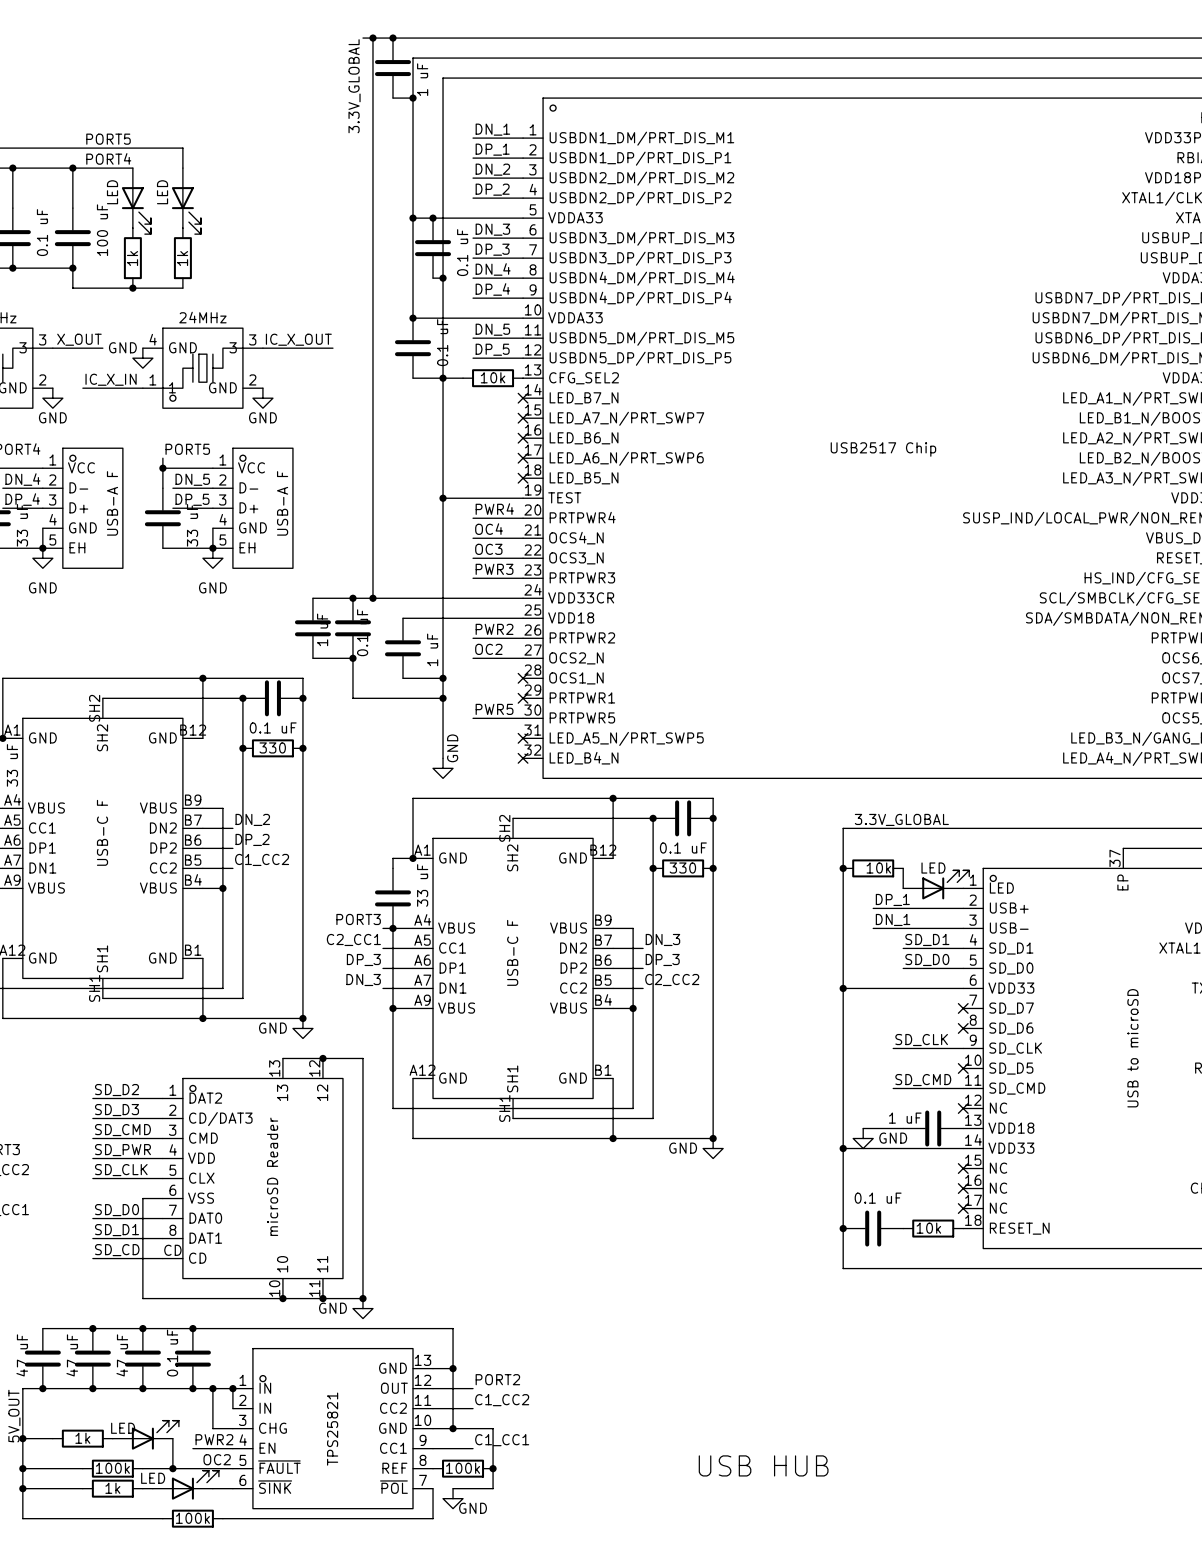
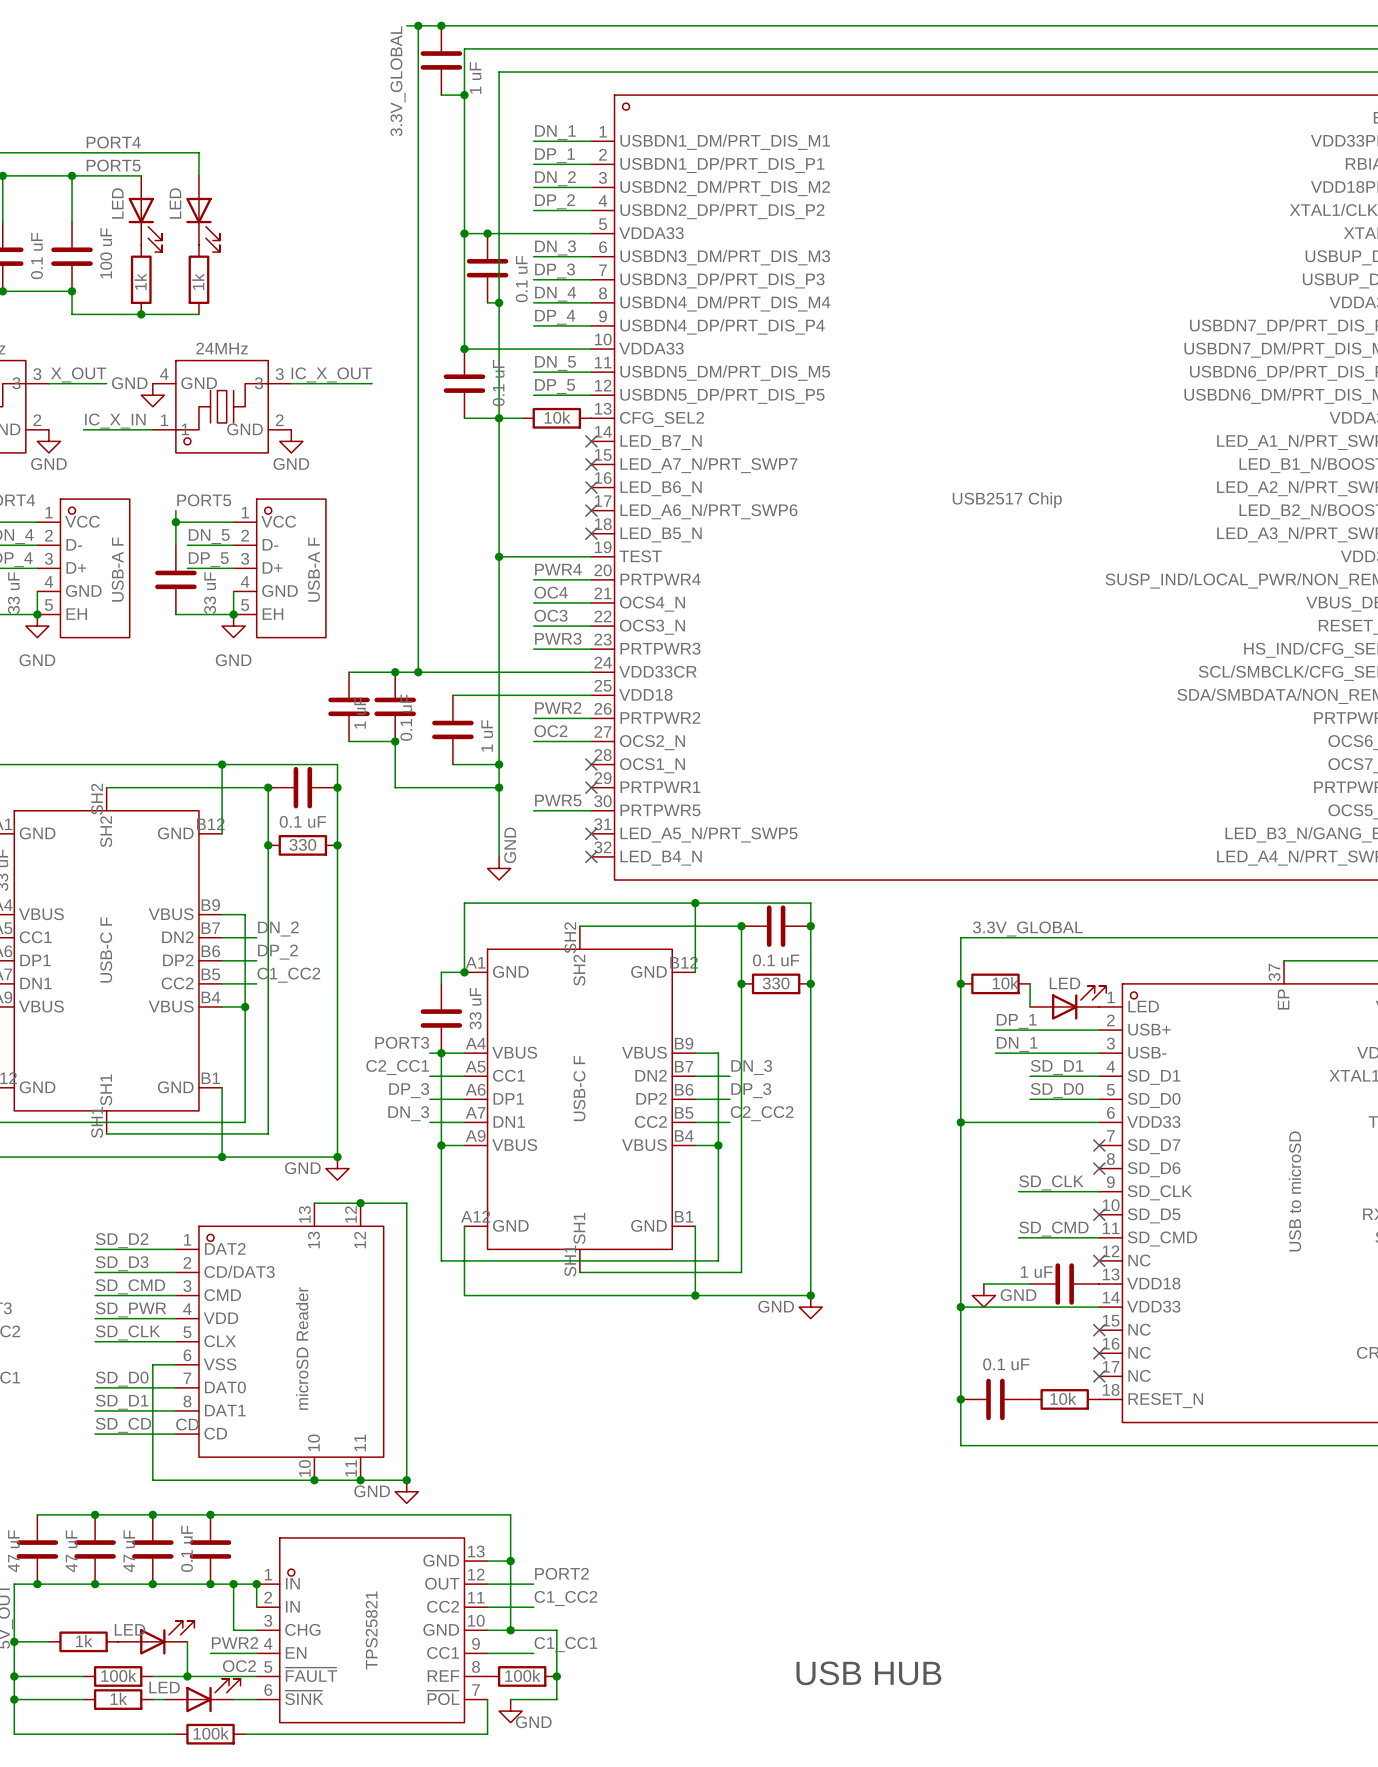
label: PORT5 (108, 139) -> PORT4 (113, 142)
label: PORT4 (108, 158) -> PORT5 (113, 165)

